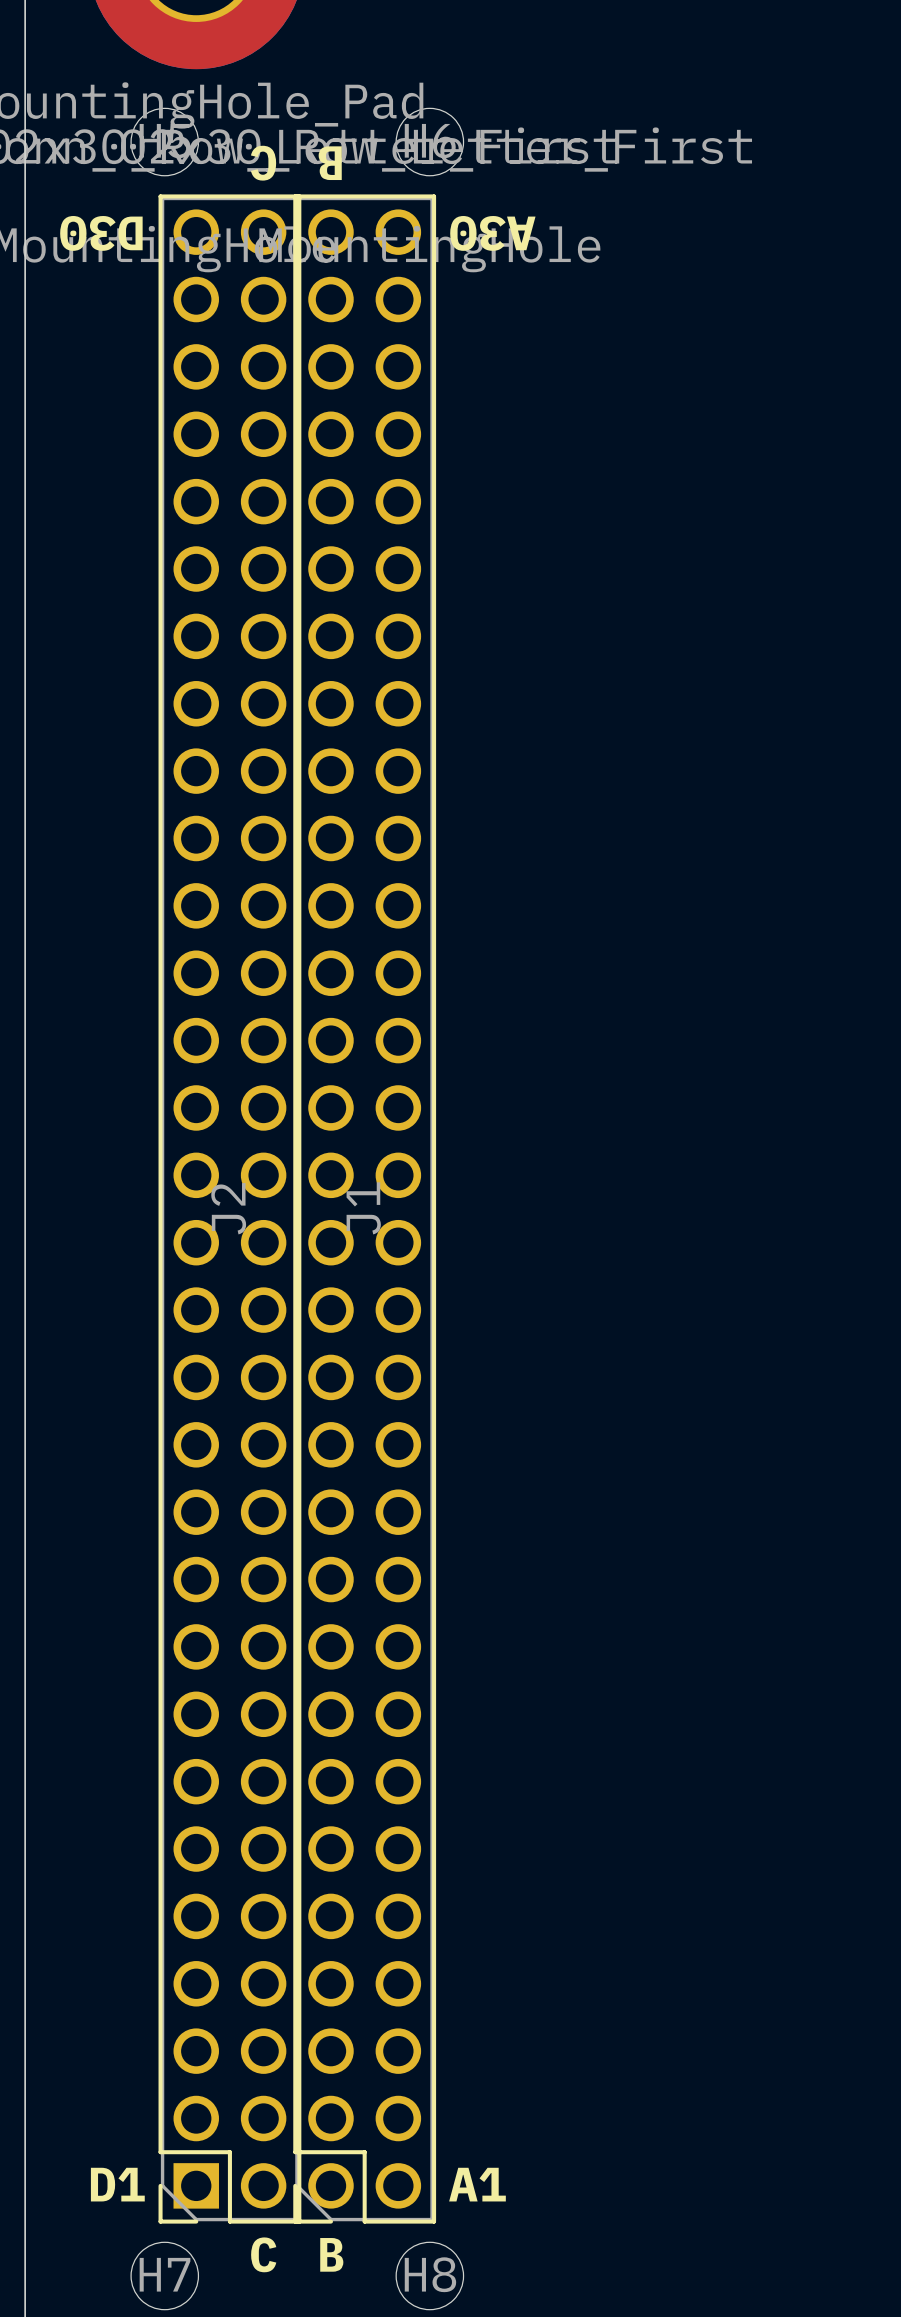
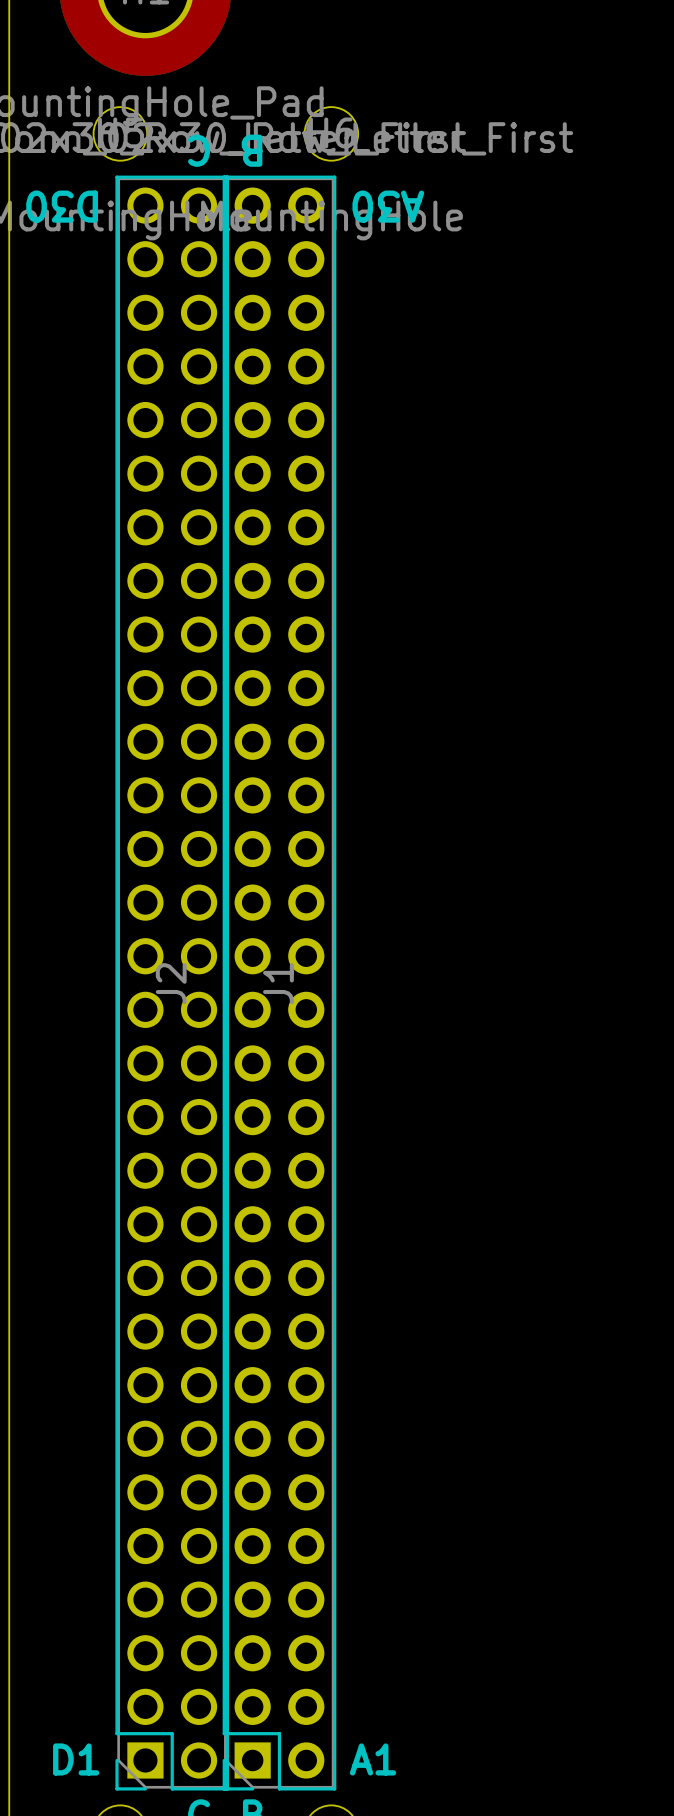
J1 footprint: [293, 194, 437, 2224] -> [222, 175, 337, 1791]

